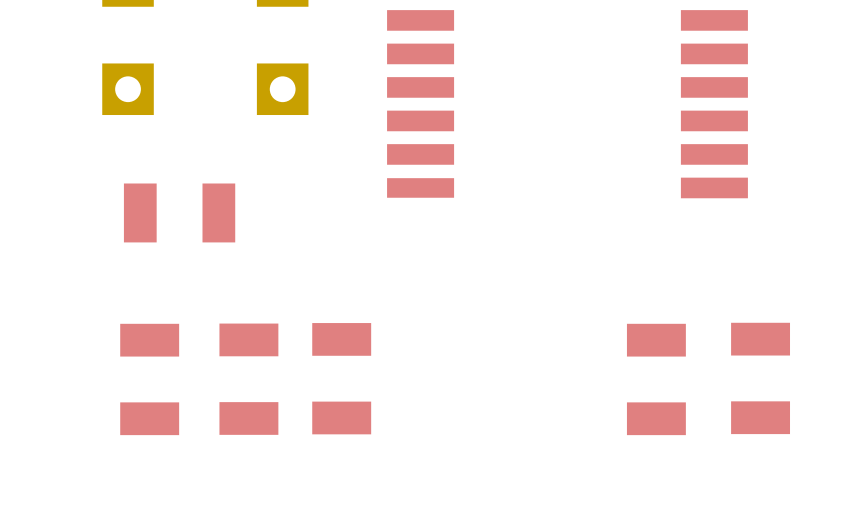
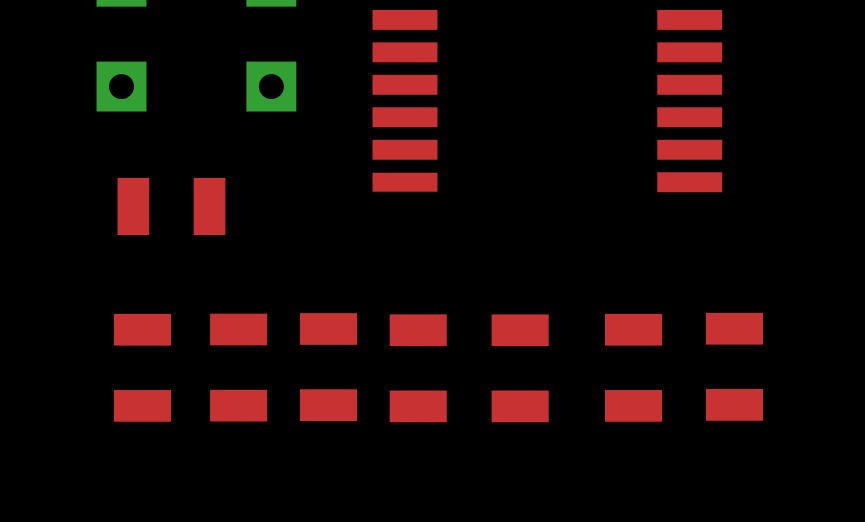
part: none -> (418, 368)
part: none -> (520, 368)

